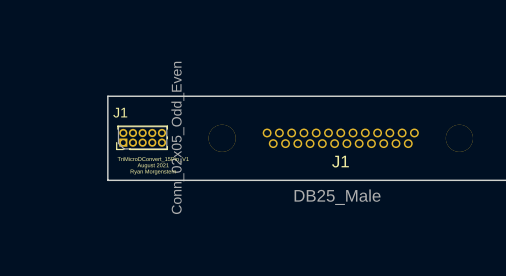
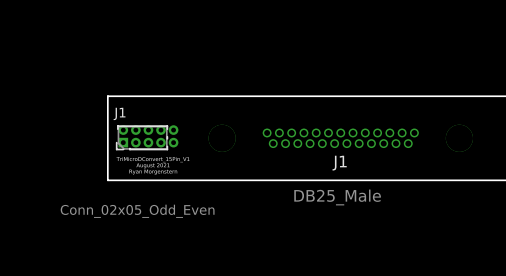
J1 footprint: [116, 125, 168, 151] -> [116, 125, 179, 151]
J1 value position: Conn_02x05_Odd_Even (177, 137) -> Conn_02x05_Odd_Even (137, 211)

